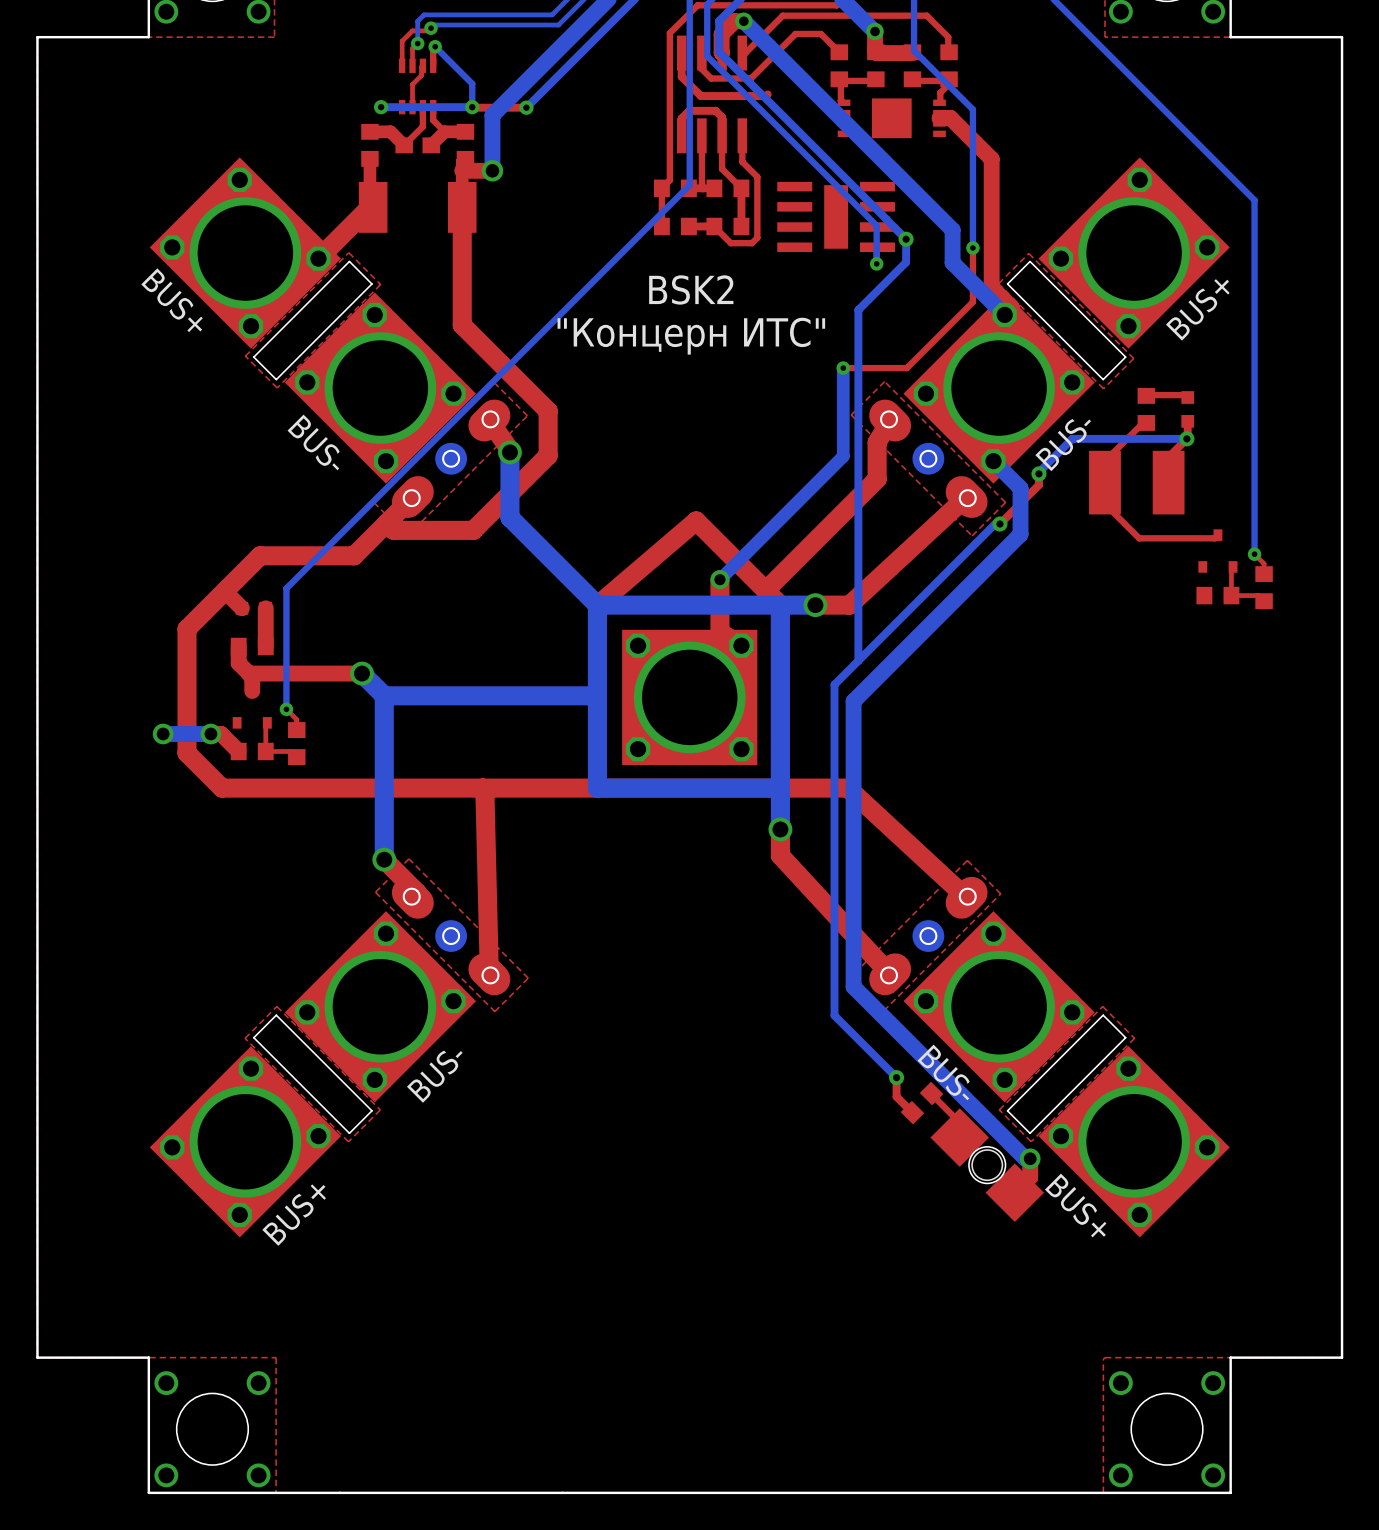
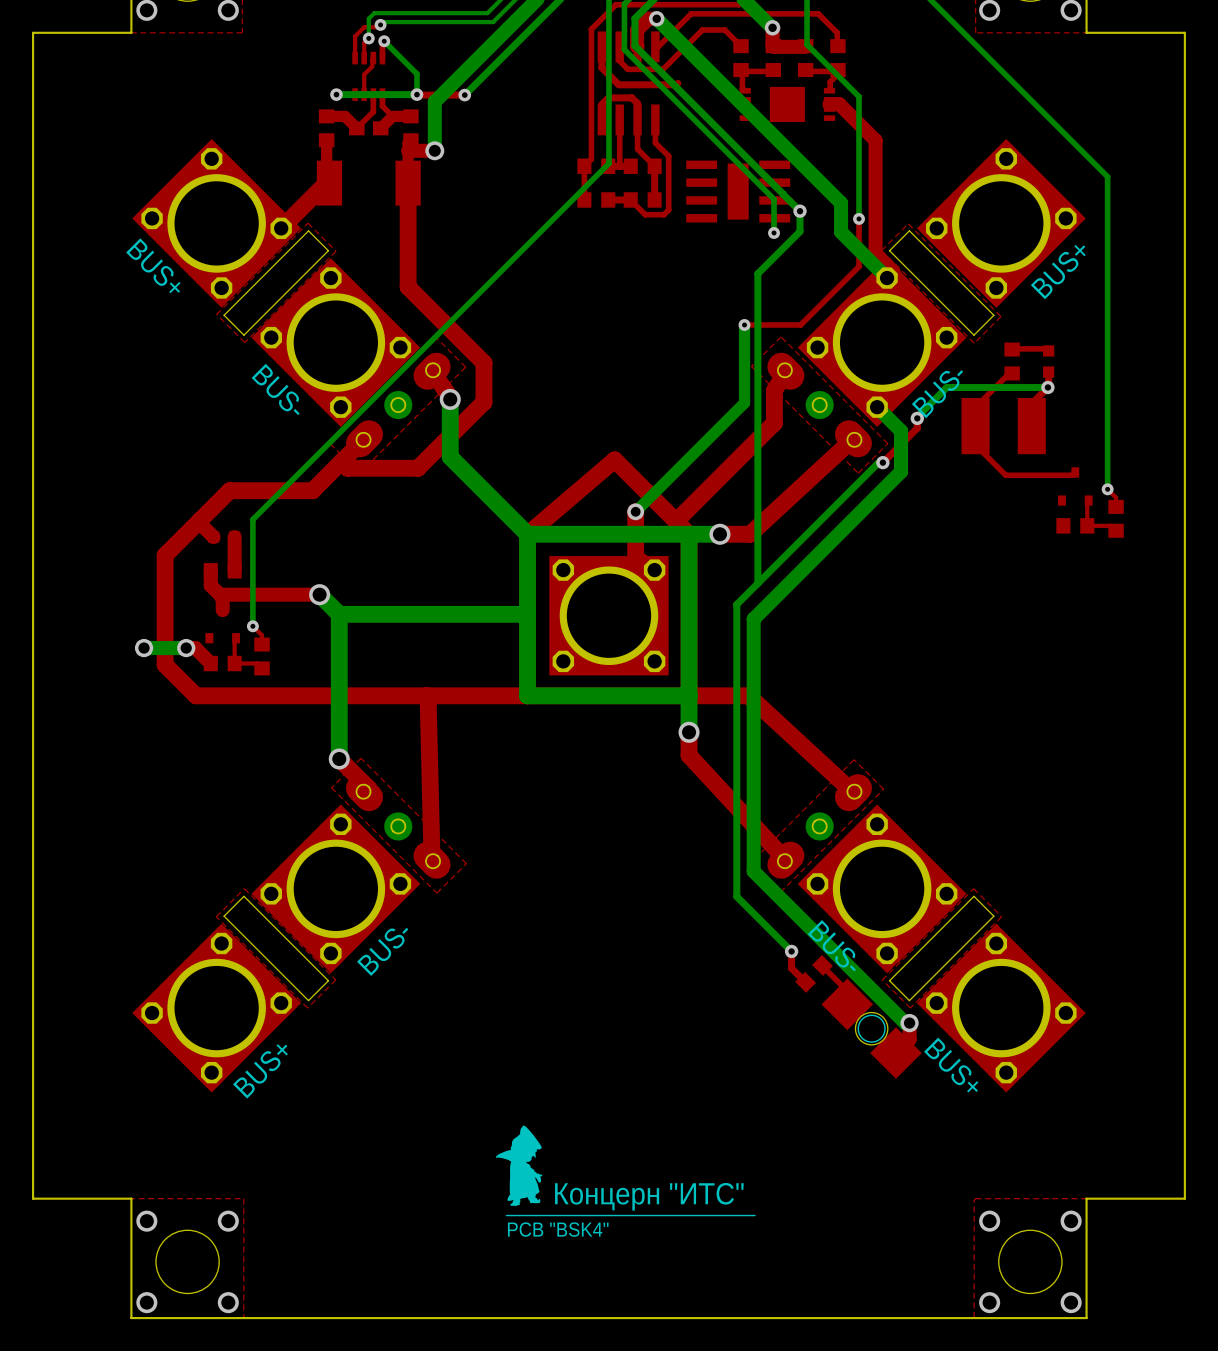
text: BSK2 (691, 289) -> none
text: "Концерн ИТС" (691, 336) -> none
drawing: none -> [495, 1125, 756, 1217]

